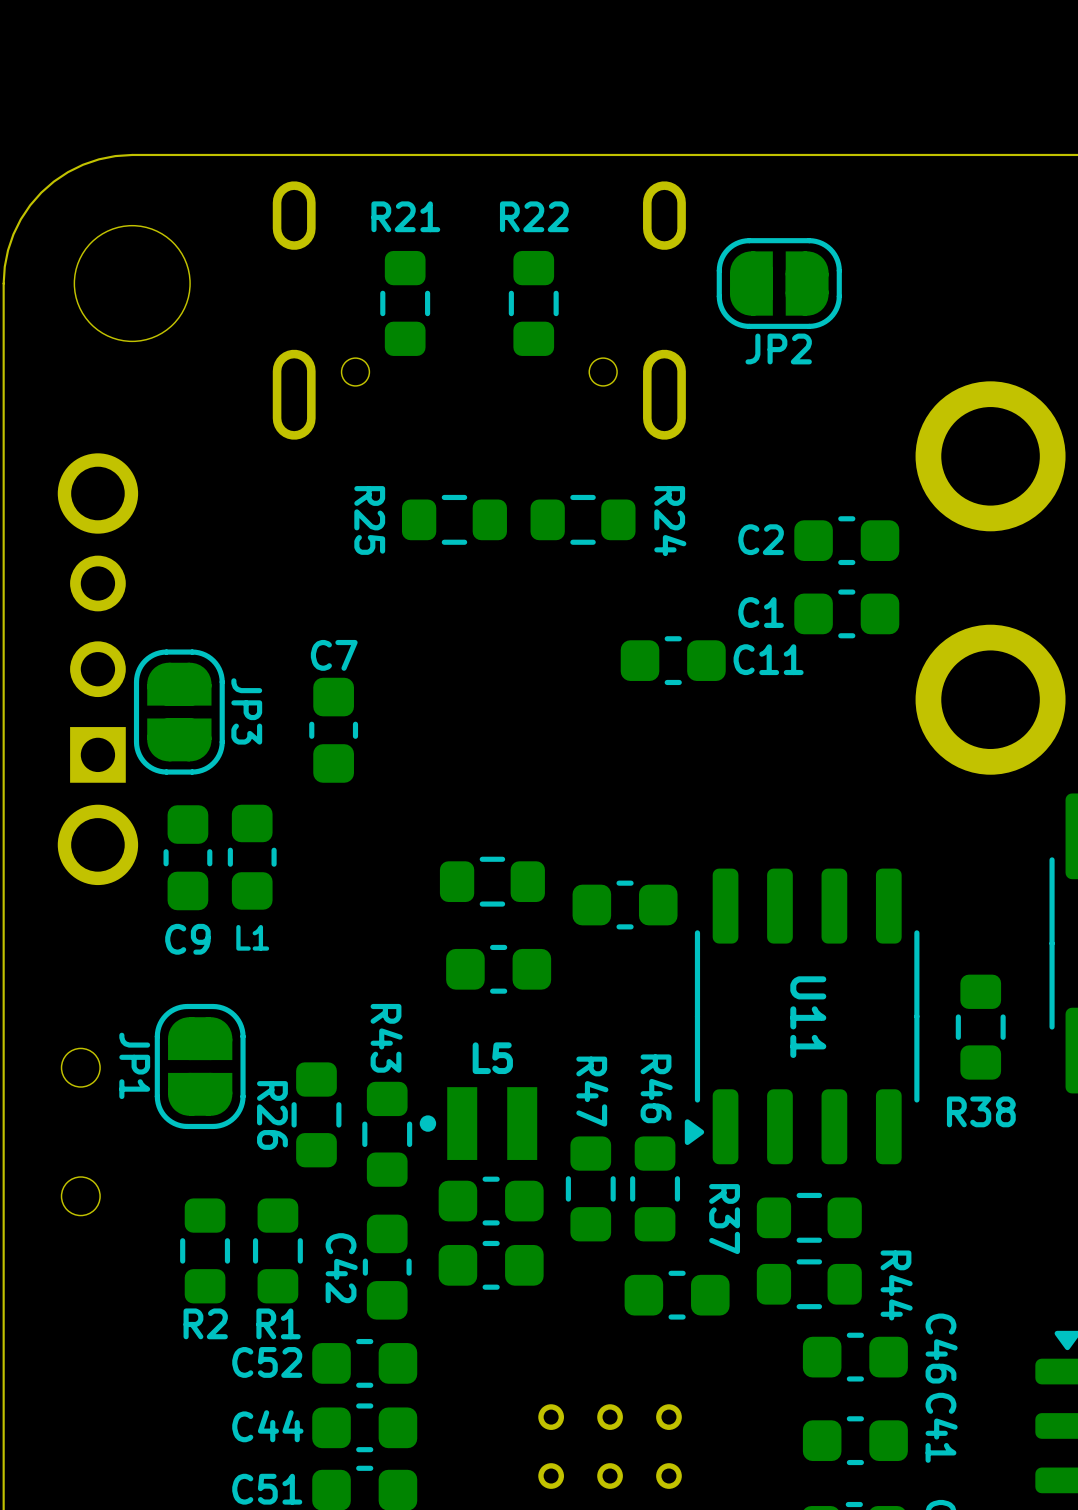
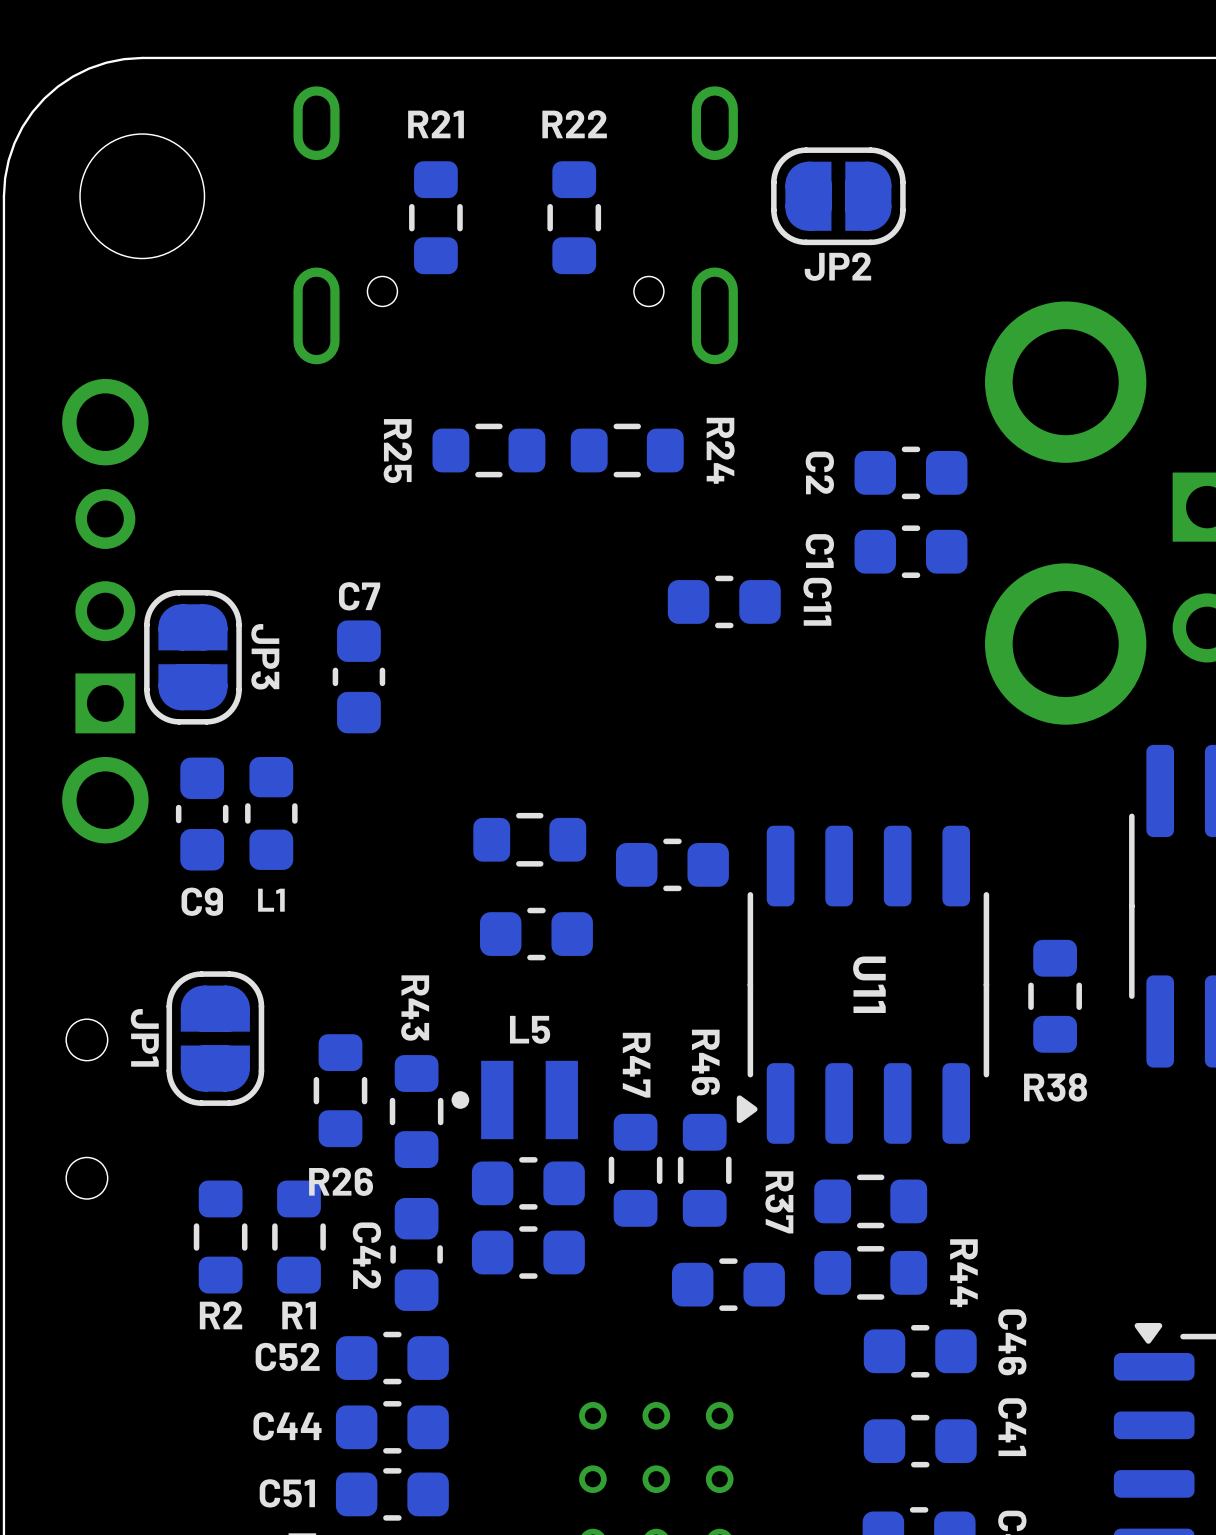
C2 name rotation: 0° (761, 539) -> 90° clockwise (819, 473)
C1 name rotation: 0° (761, 612) -> 90° clockwise (819, 551)
C11 name rotation: 0° (768, 659) -> 90° clockwise (817, 601)
R26 name rotation: 0° (272, 1115) -> 90° counterclockwise (341, 1181)
R26 name position: R26 (272, 1115) -> R26 (341, 1181)

